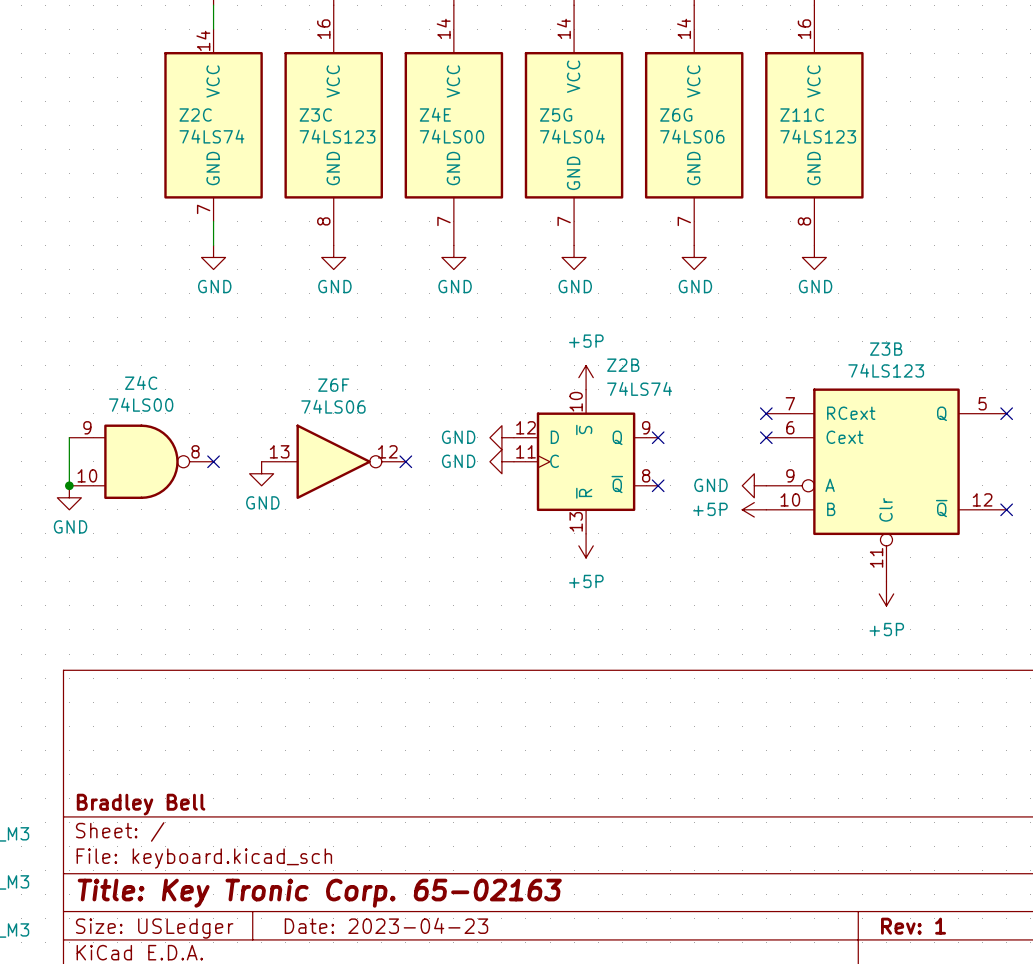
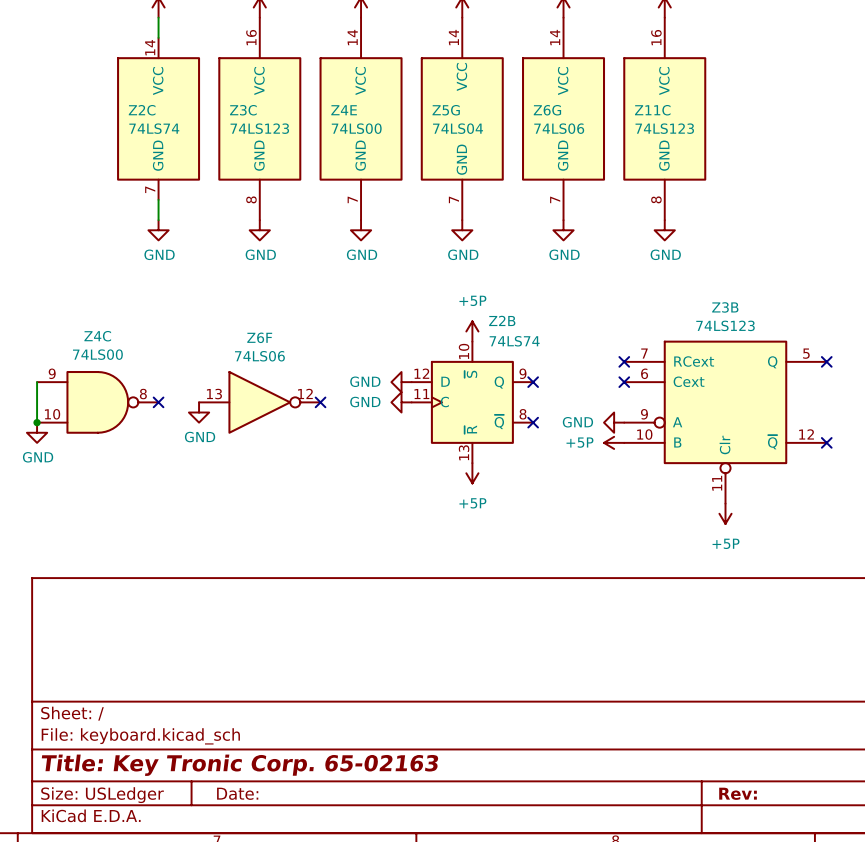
title block: Bradley Bell (141, 804) -> none
title block: Date: 2023-04-23 (386, 925) -> Date: (237, 793)
title block: Rev: 1 (913, 926) -> Rev: (738, 793)

